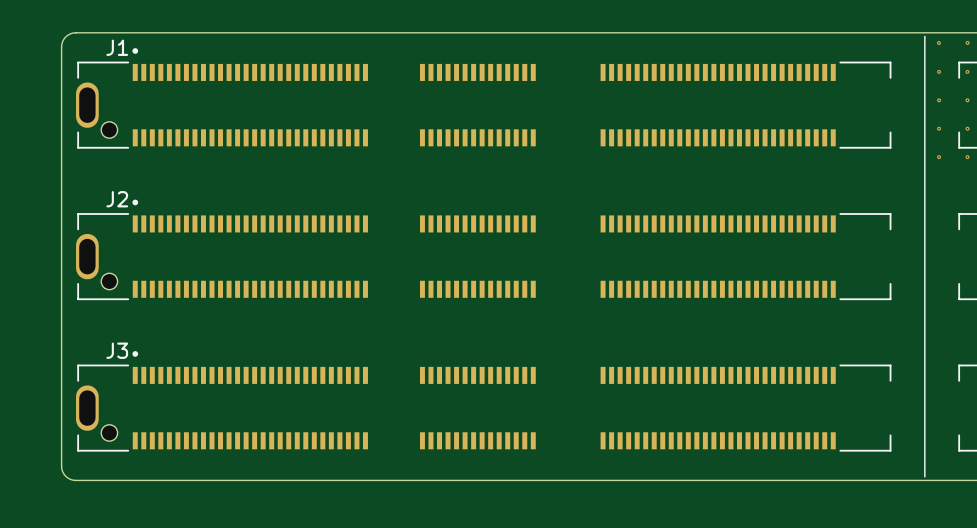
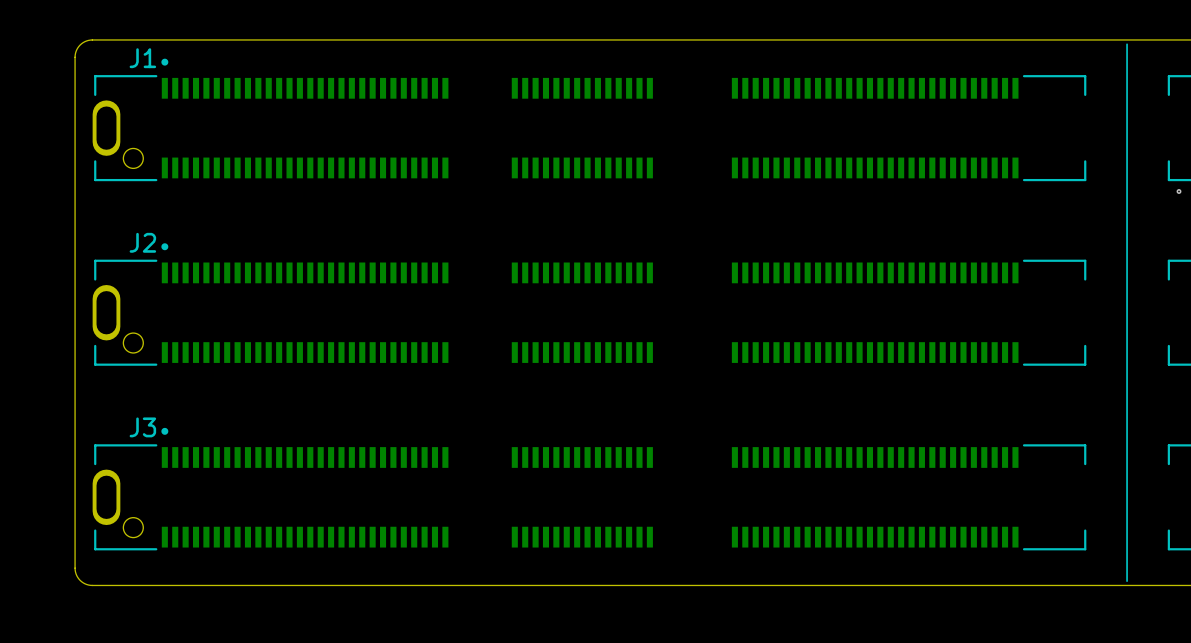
via: (967, 42) -> none
via: (938, 43) -> none
via: (939, 71) -> none
via: (967, 71) -> none
via: (939, 100) -> none
via: (967, 100) -> none
via: (939, 128) -> none
via: (967, 128) -> none
via: (939, 157) -> none

